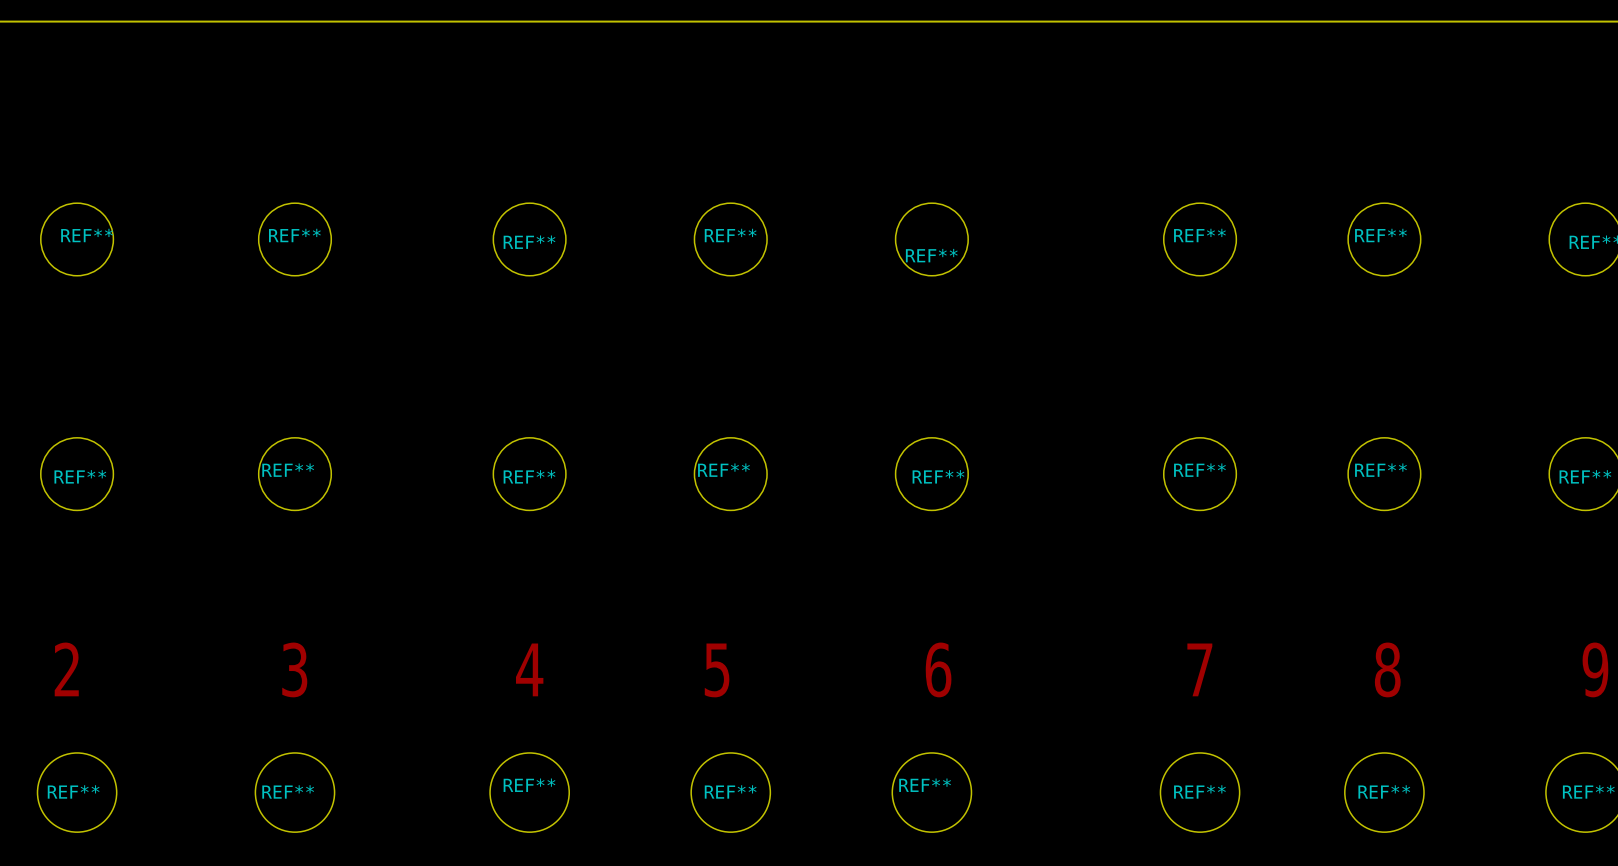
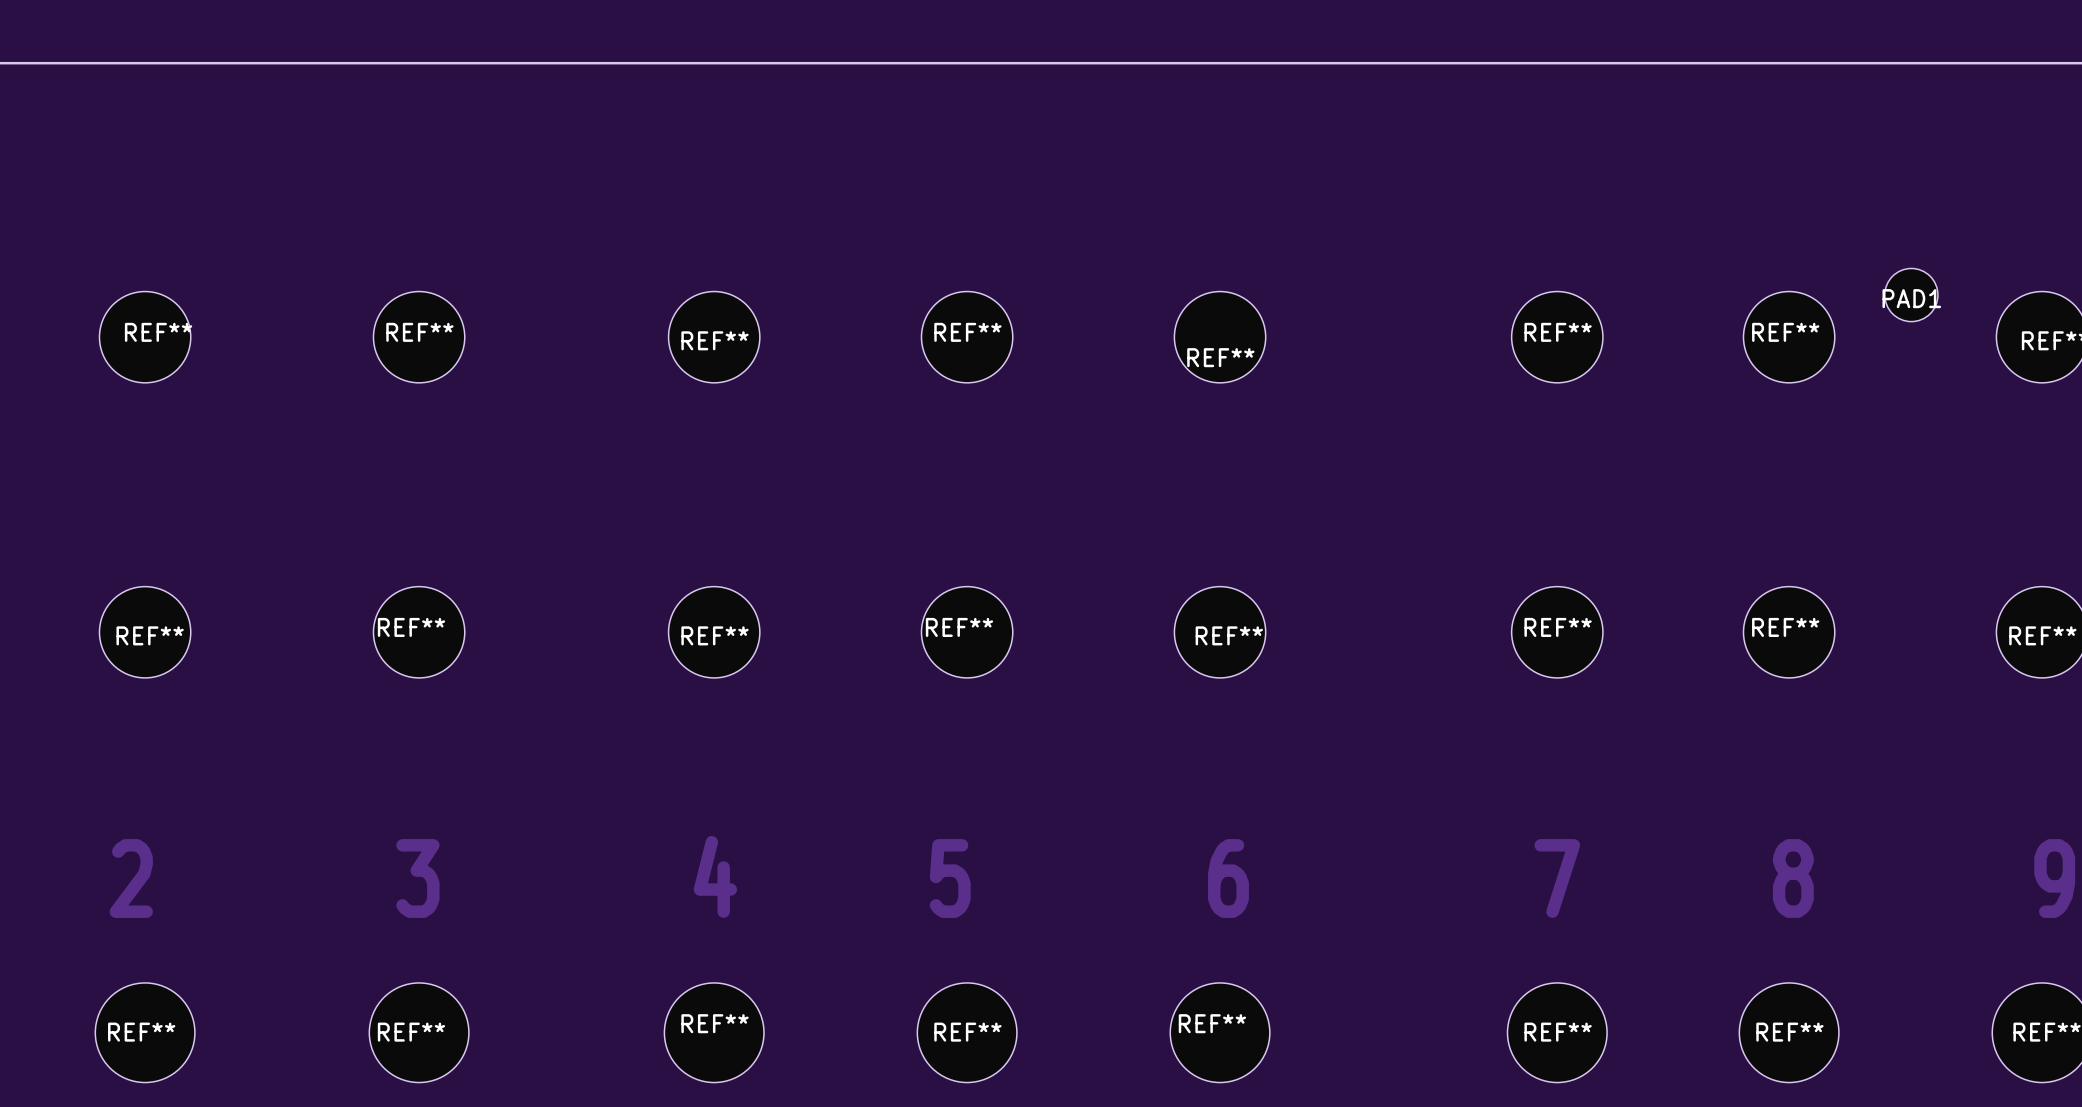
PAD1: none -> (1911, 295)

